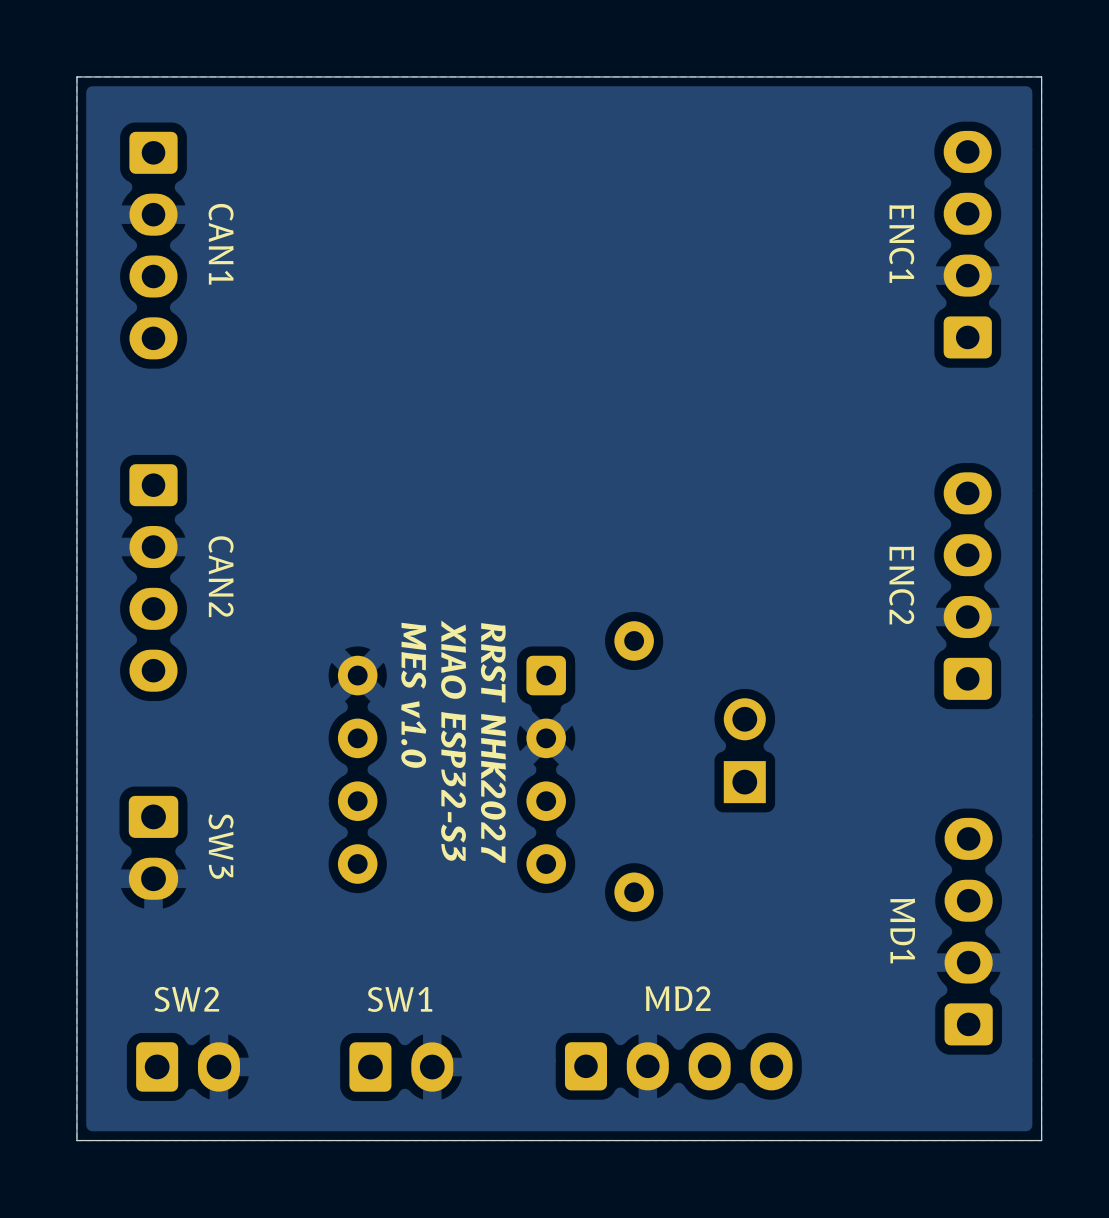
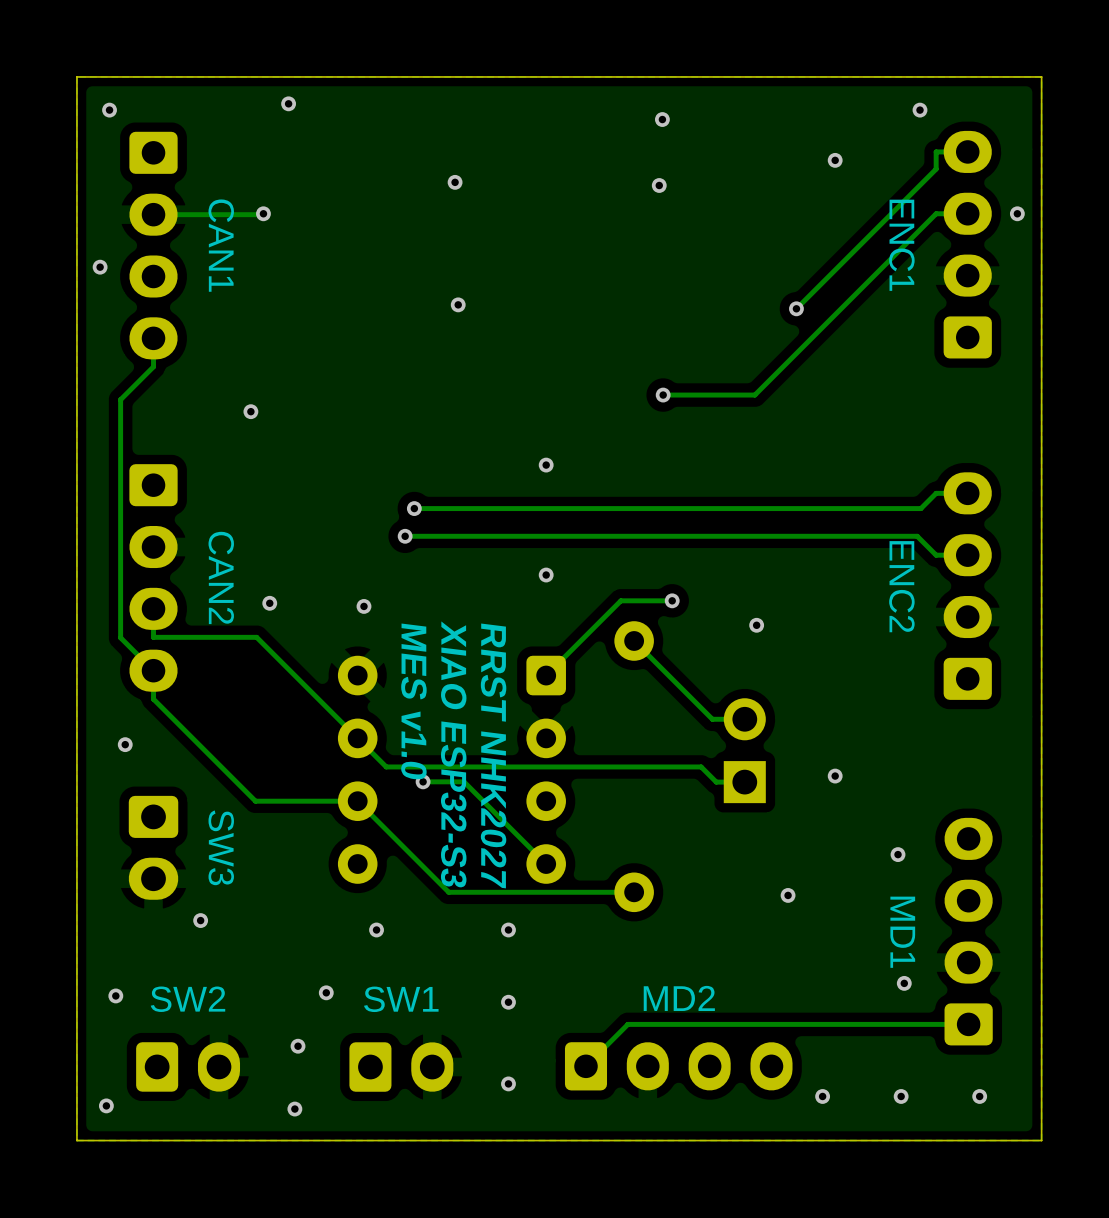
via: none -> (288, 103)
via: none -> (109, 110)
via: none -> (919, 110)
via: none -> (662, 119)
track: none -> (967, 151) (936, 151) (936, 169) (796, 308)
via: none -> (835, 160)
via: none -> (455, 182)
via: none -> (659, 185)
track: none -> (263, 213) (153, 214)
via: none -> (263, 213)
track: none -> (967, 213) (936, 213) (754, 395) (663, 395)
via: none -> (1017, 213)
via: none -> (100, 267)
via: none -> (458, 304)
via: none -> (796, 308)
track: none -> (153, 338) (153, 366) (120, 399) (120, 637) (153, 670) (153, 699) (255, 801) (357, 801) (448, 892) (634, 892)
via: none -> (663, 395)
via: none -> (250, 411)
via: none -> (546, 465)
track: none -> (967, 493) (936, 493) (920, 508) (414, 508)
via: none -> (414, 508)
track: none -> (405, 536) (917, 536) (936, 555) (967, 555)
via: none -> (405, 536)
via: none -> (546, 575)
track: none -> (672, 600) (620, 600) (546, 675)
via: none -> (672, 600)
via: none -> (269, 603)
via: none -> (363, 606)
track: none -> (153, 608) (153, 637) (256, 637) (386, 766) (701, 766) (716, 782) (744, 782)
via: none -> (756, 625)
track: none -> (634, 640) (712, 719) (744, 719)
via: none -> (125, 744)
via: none -> (835, 776)
track: none -> (423, 781) (464, 781) (546, 864)
via: none -> (423, 781)
via: none -> (898, 854)
via: none -> (788, 895)
via: none -> (200, 920)
via: none -> (376, 929)
via: none -> (508, 929)
via: none -> (904, 983)
via: none -> (326, 992)
via: none -> (115, 995)
via: none -> (508, 1002)
track: none -> (968, 1024) (627, 1024) (585, 1066)
via: none -> (298, 1046)
via: none -> (508, 1083)
via: none -> (822, 1096)
via: none -> (901, 1096)
via: none -> (979, 1096)
via: none -> (106, 1105)
via: none -> (294, 1109)

